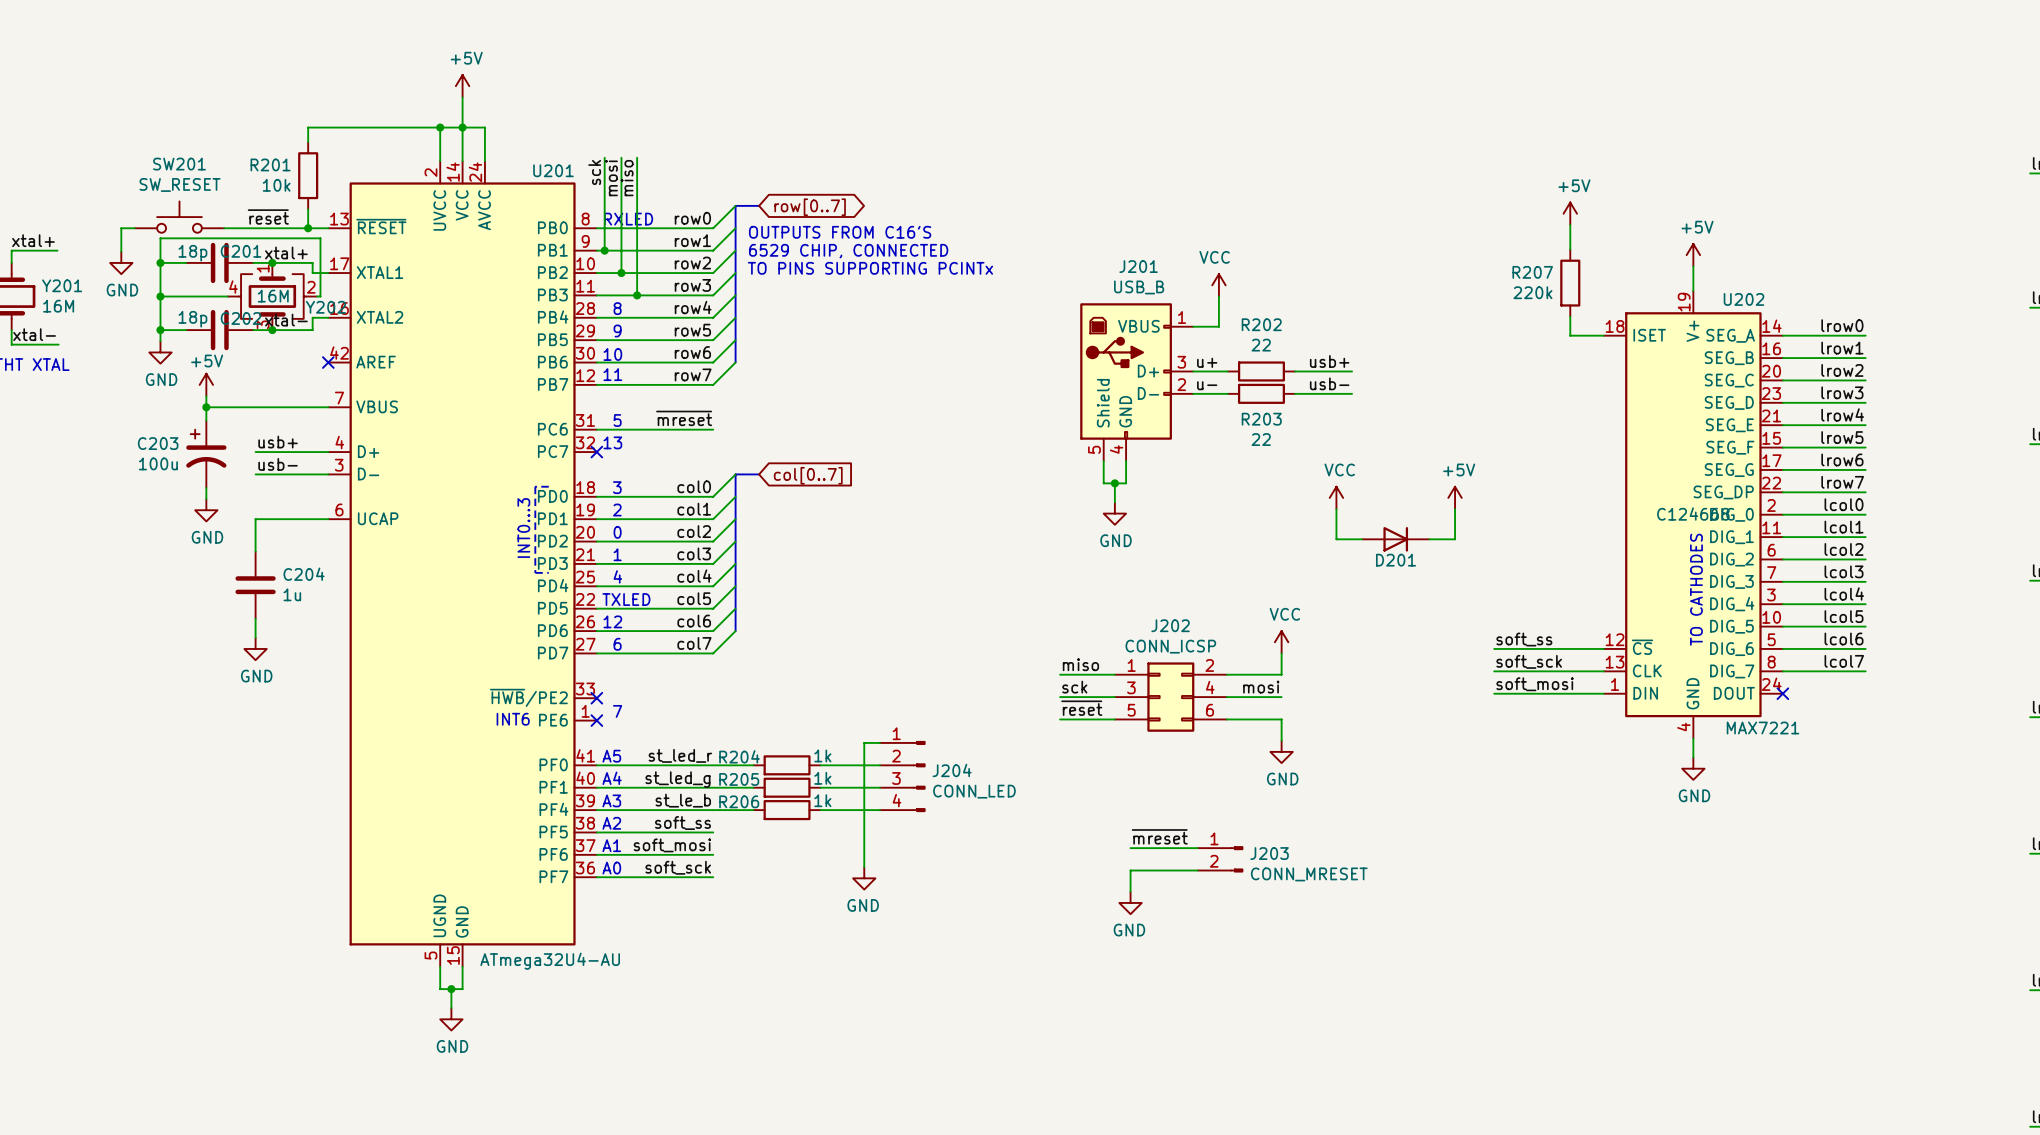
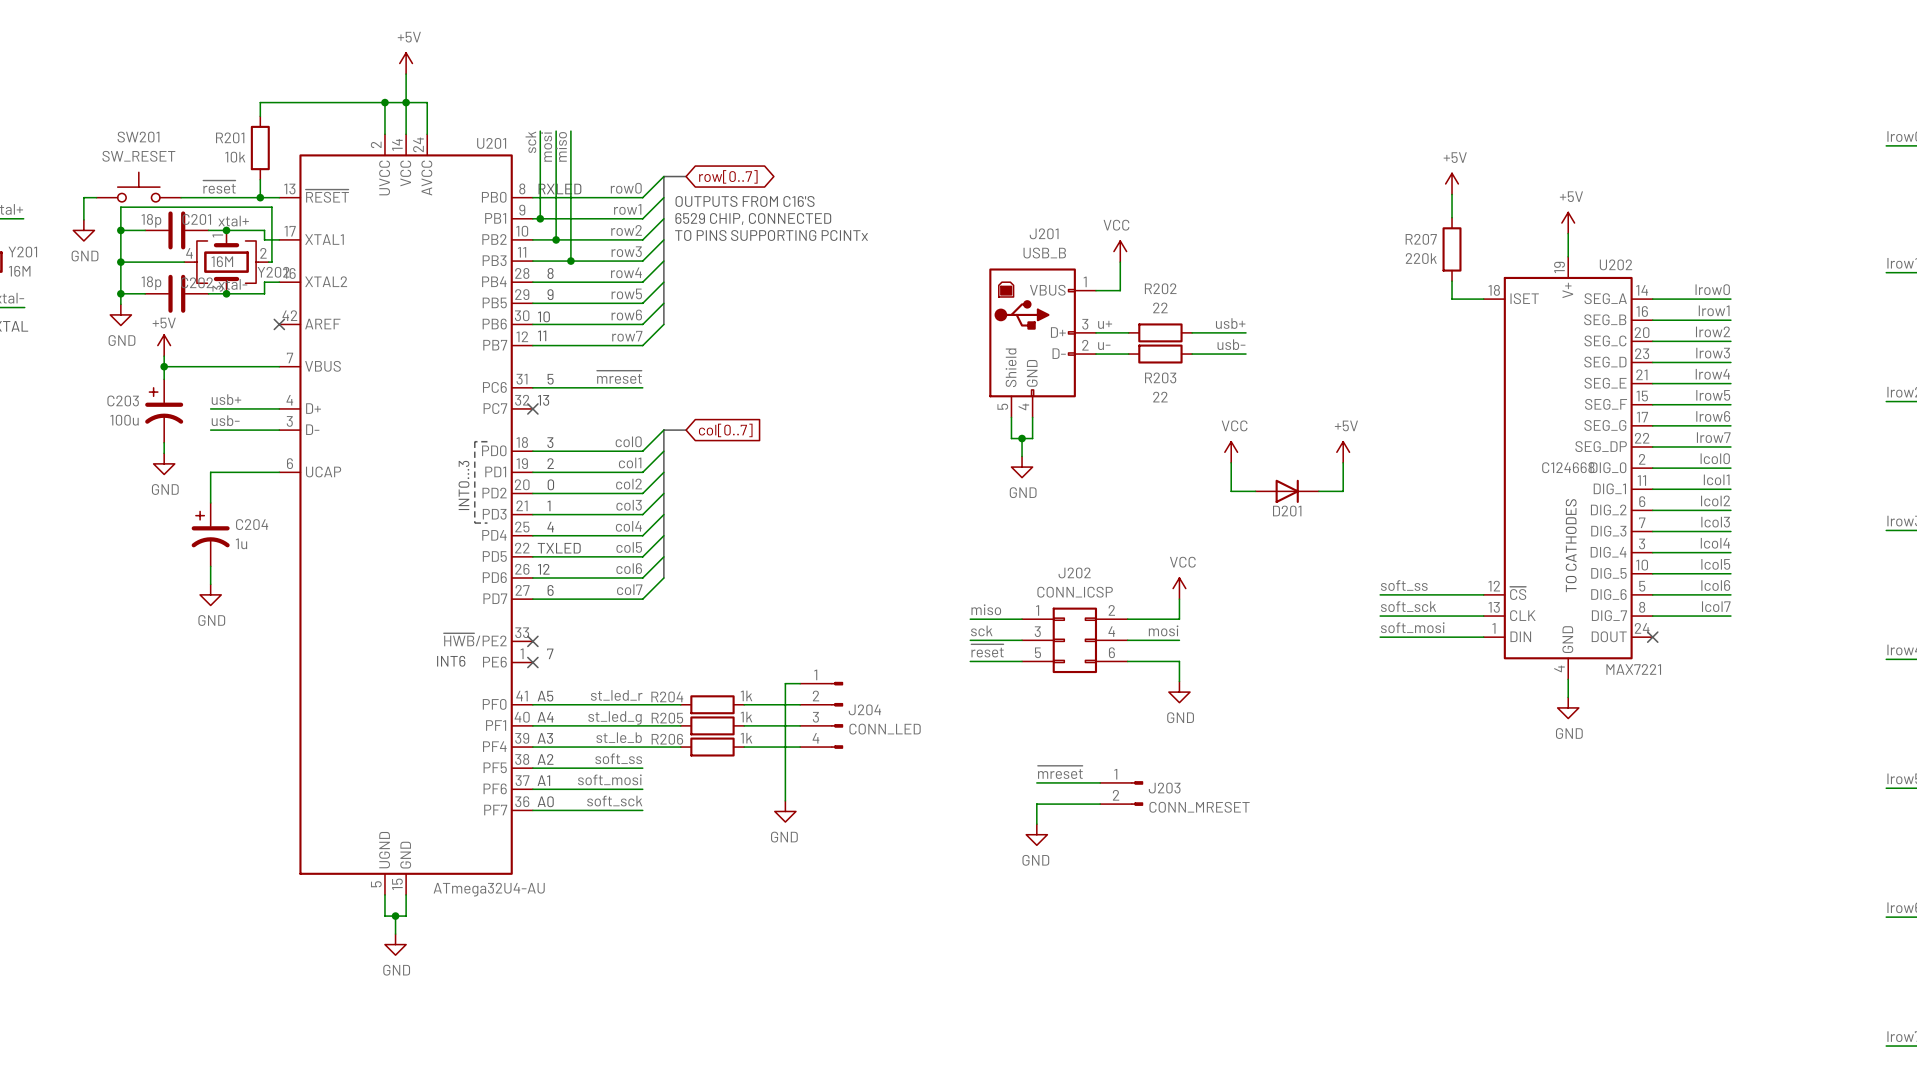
C204 symbol: [235, 551, 276, 619] -> [191, 502, 230, 567]

